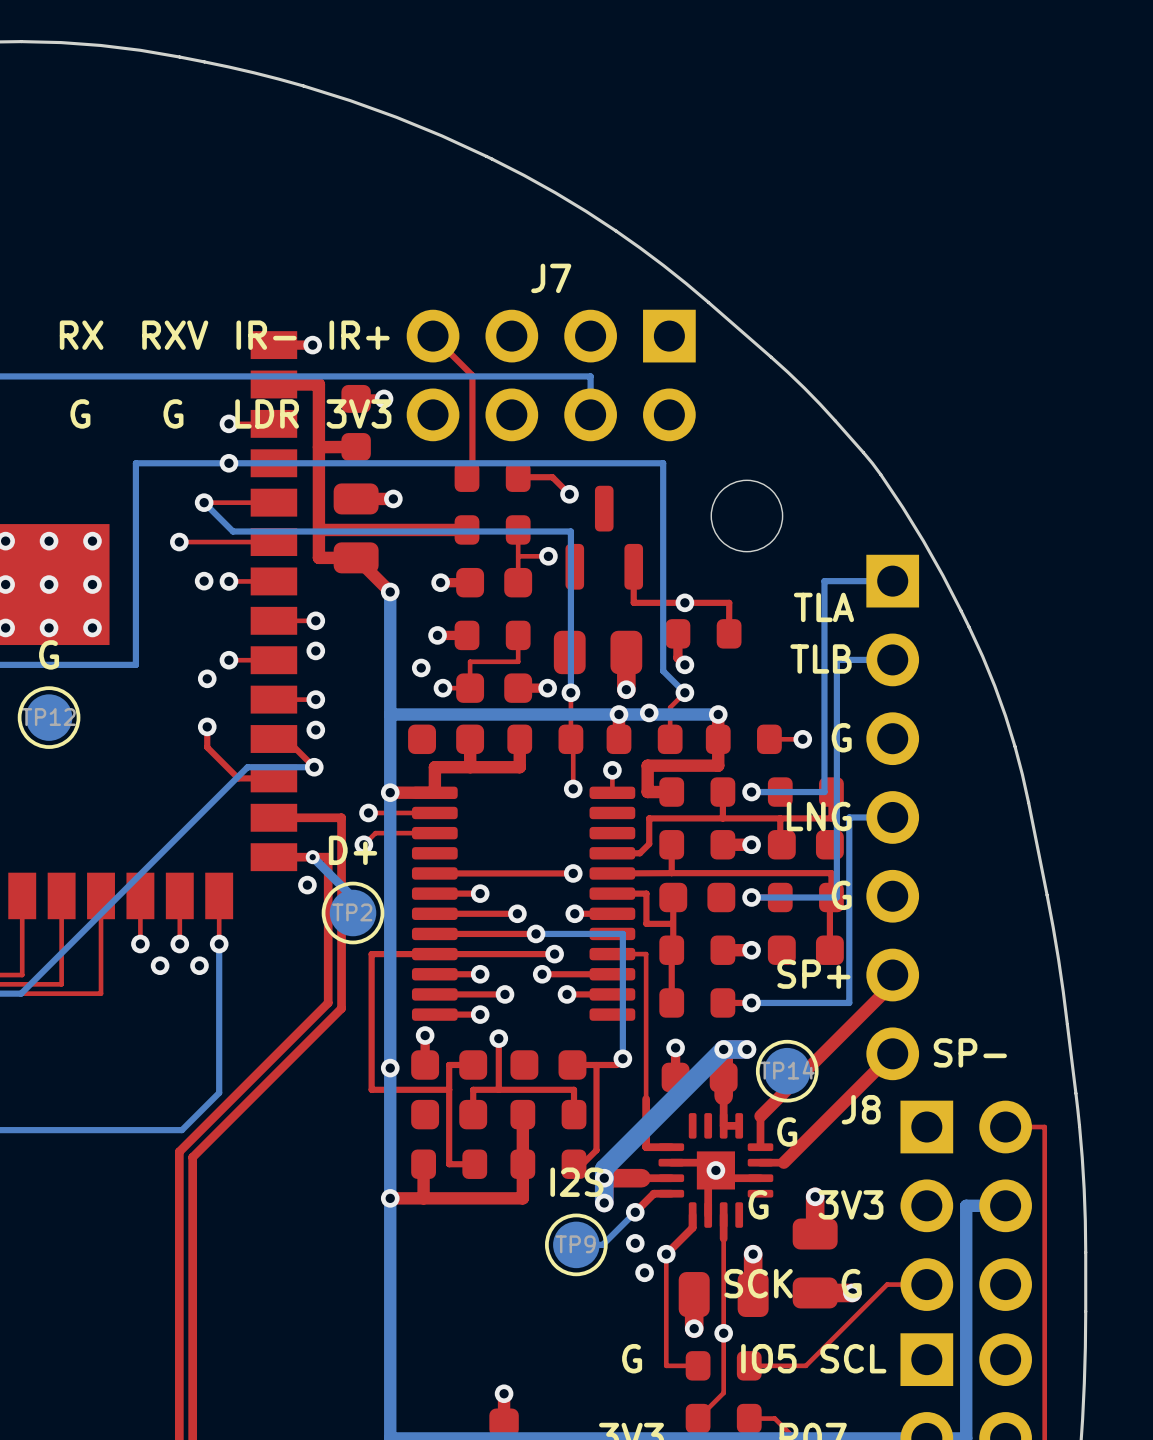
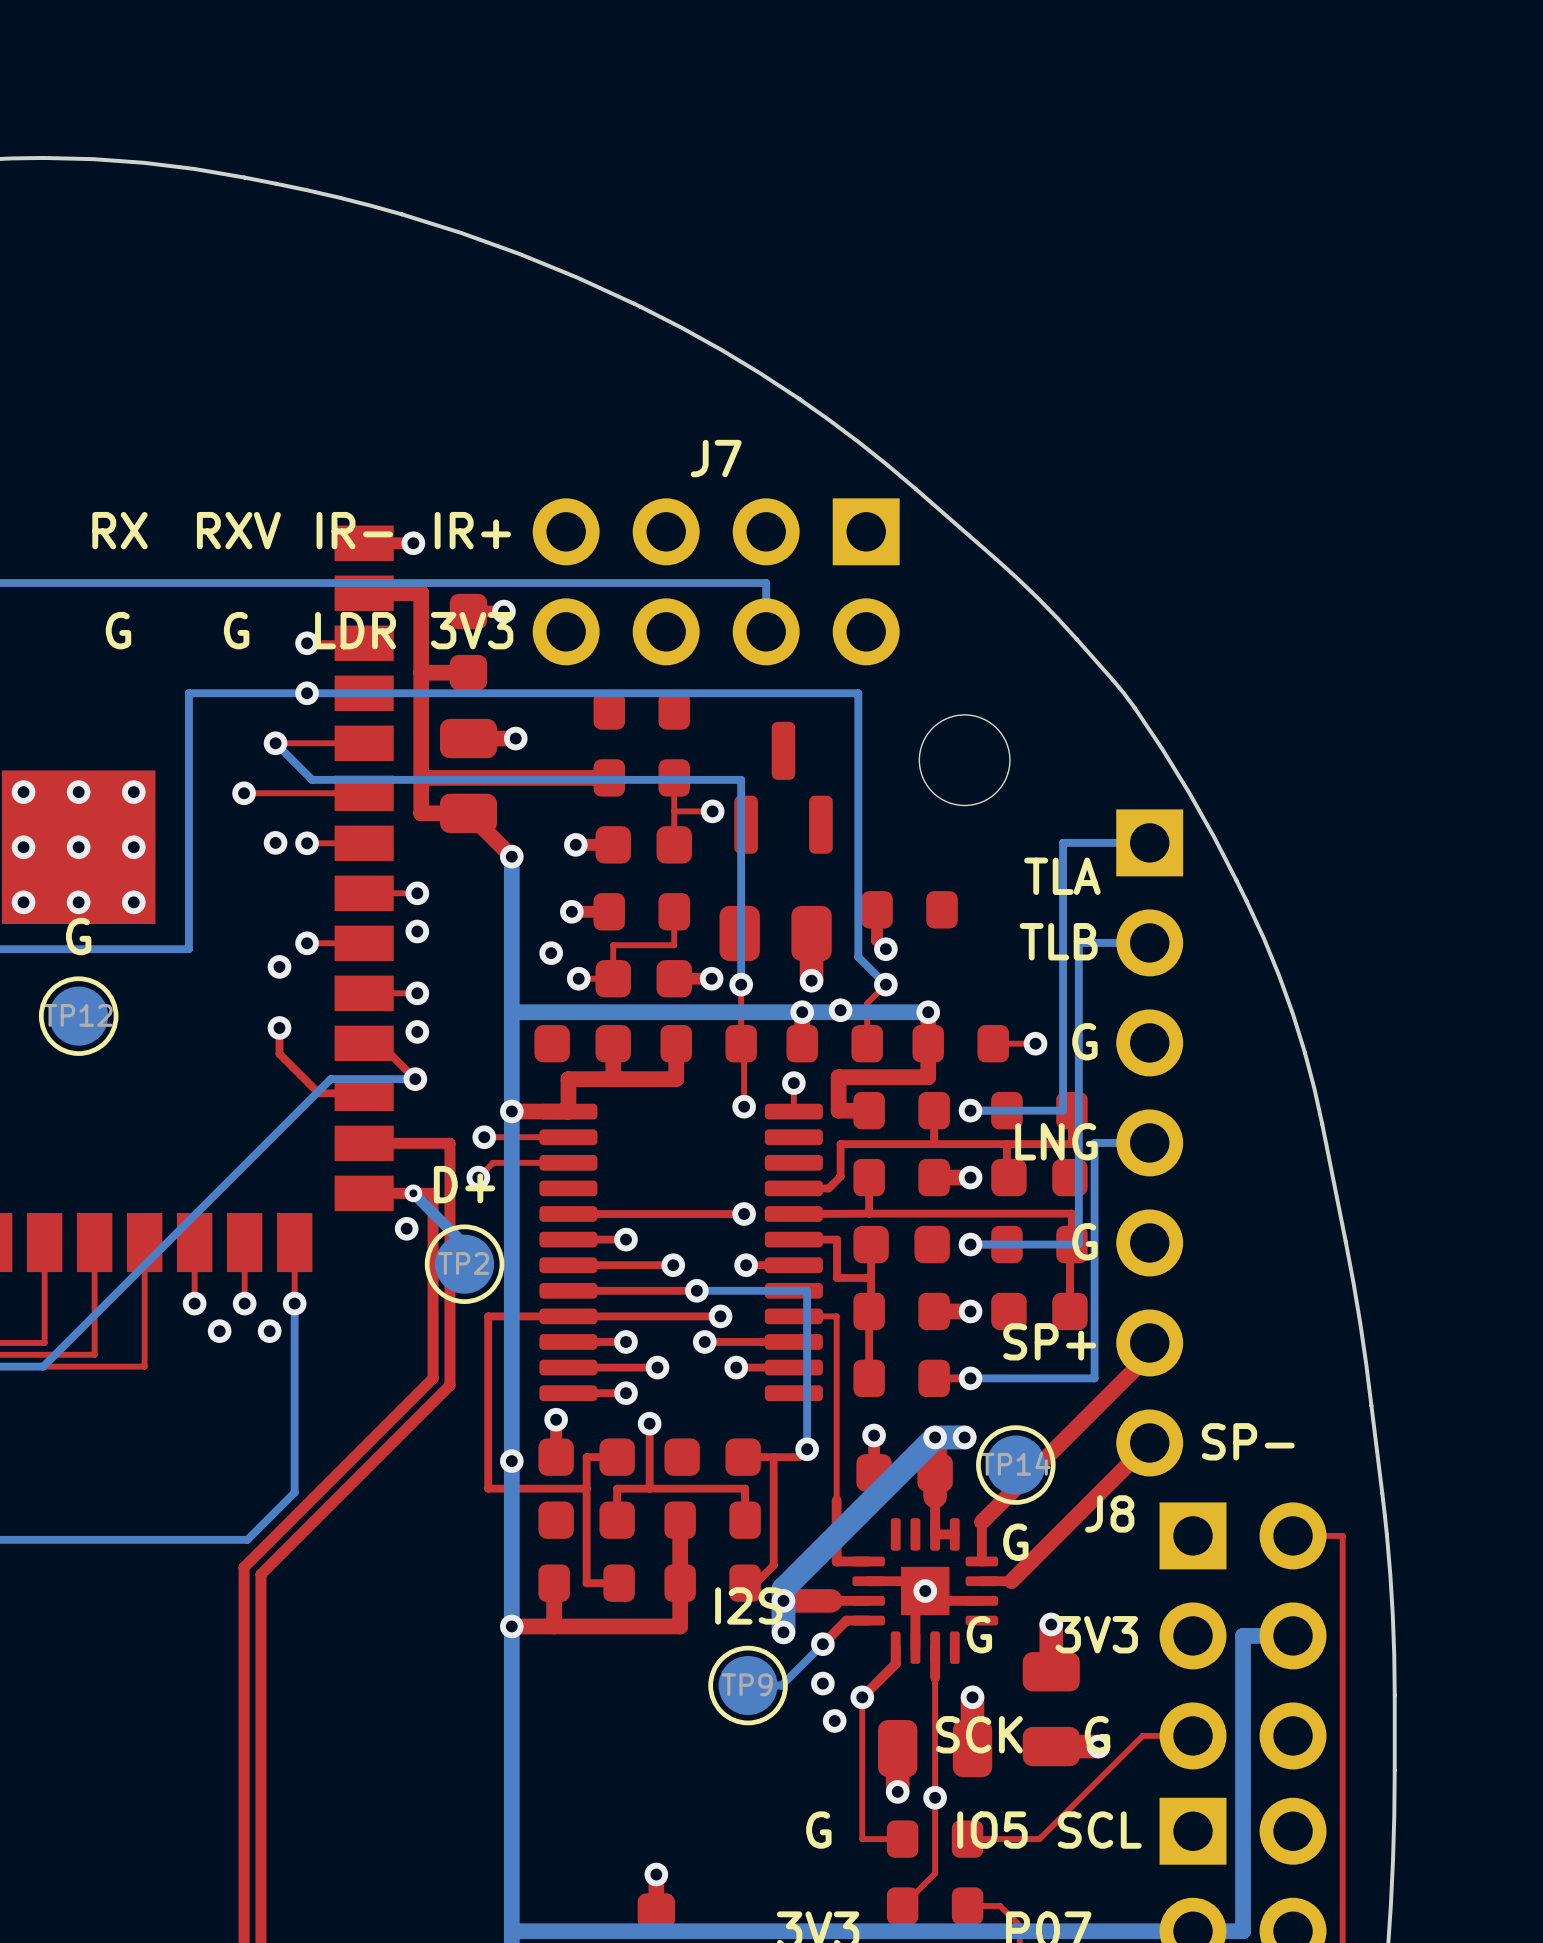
top track: (433, 336) (472, 375) (472, 471) (467, 477) -> none
top track: (518, 477) (552, 477) (569, 494) -> none
via: (569, 494) -> none
top track: (633, 566) (633, 602) (729, 602) (729, 633) -> none
via: (684, 602) -> none

